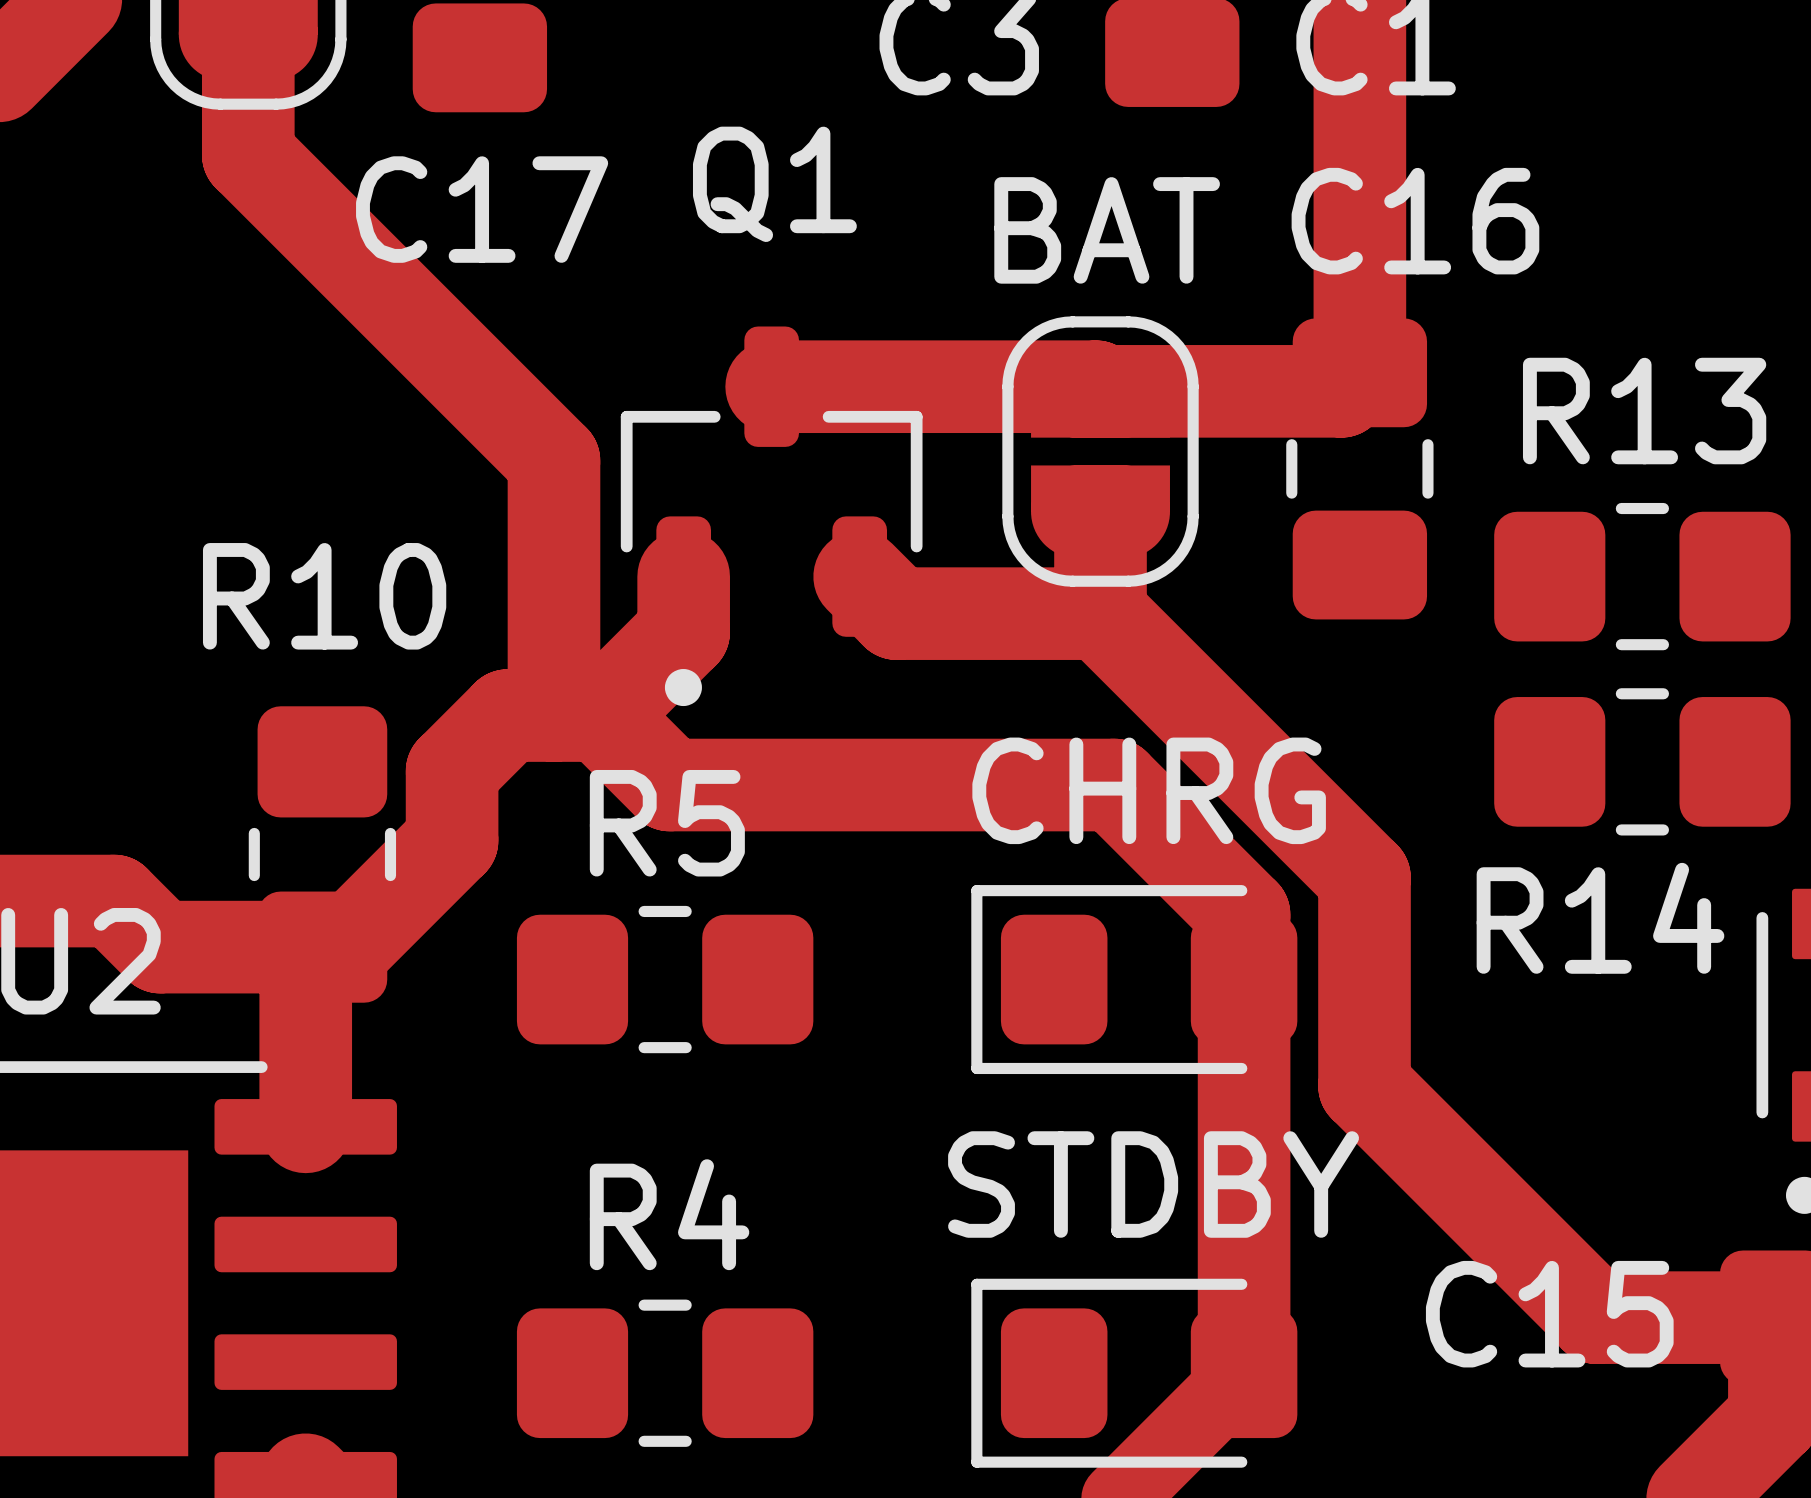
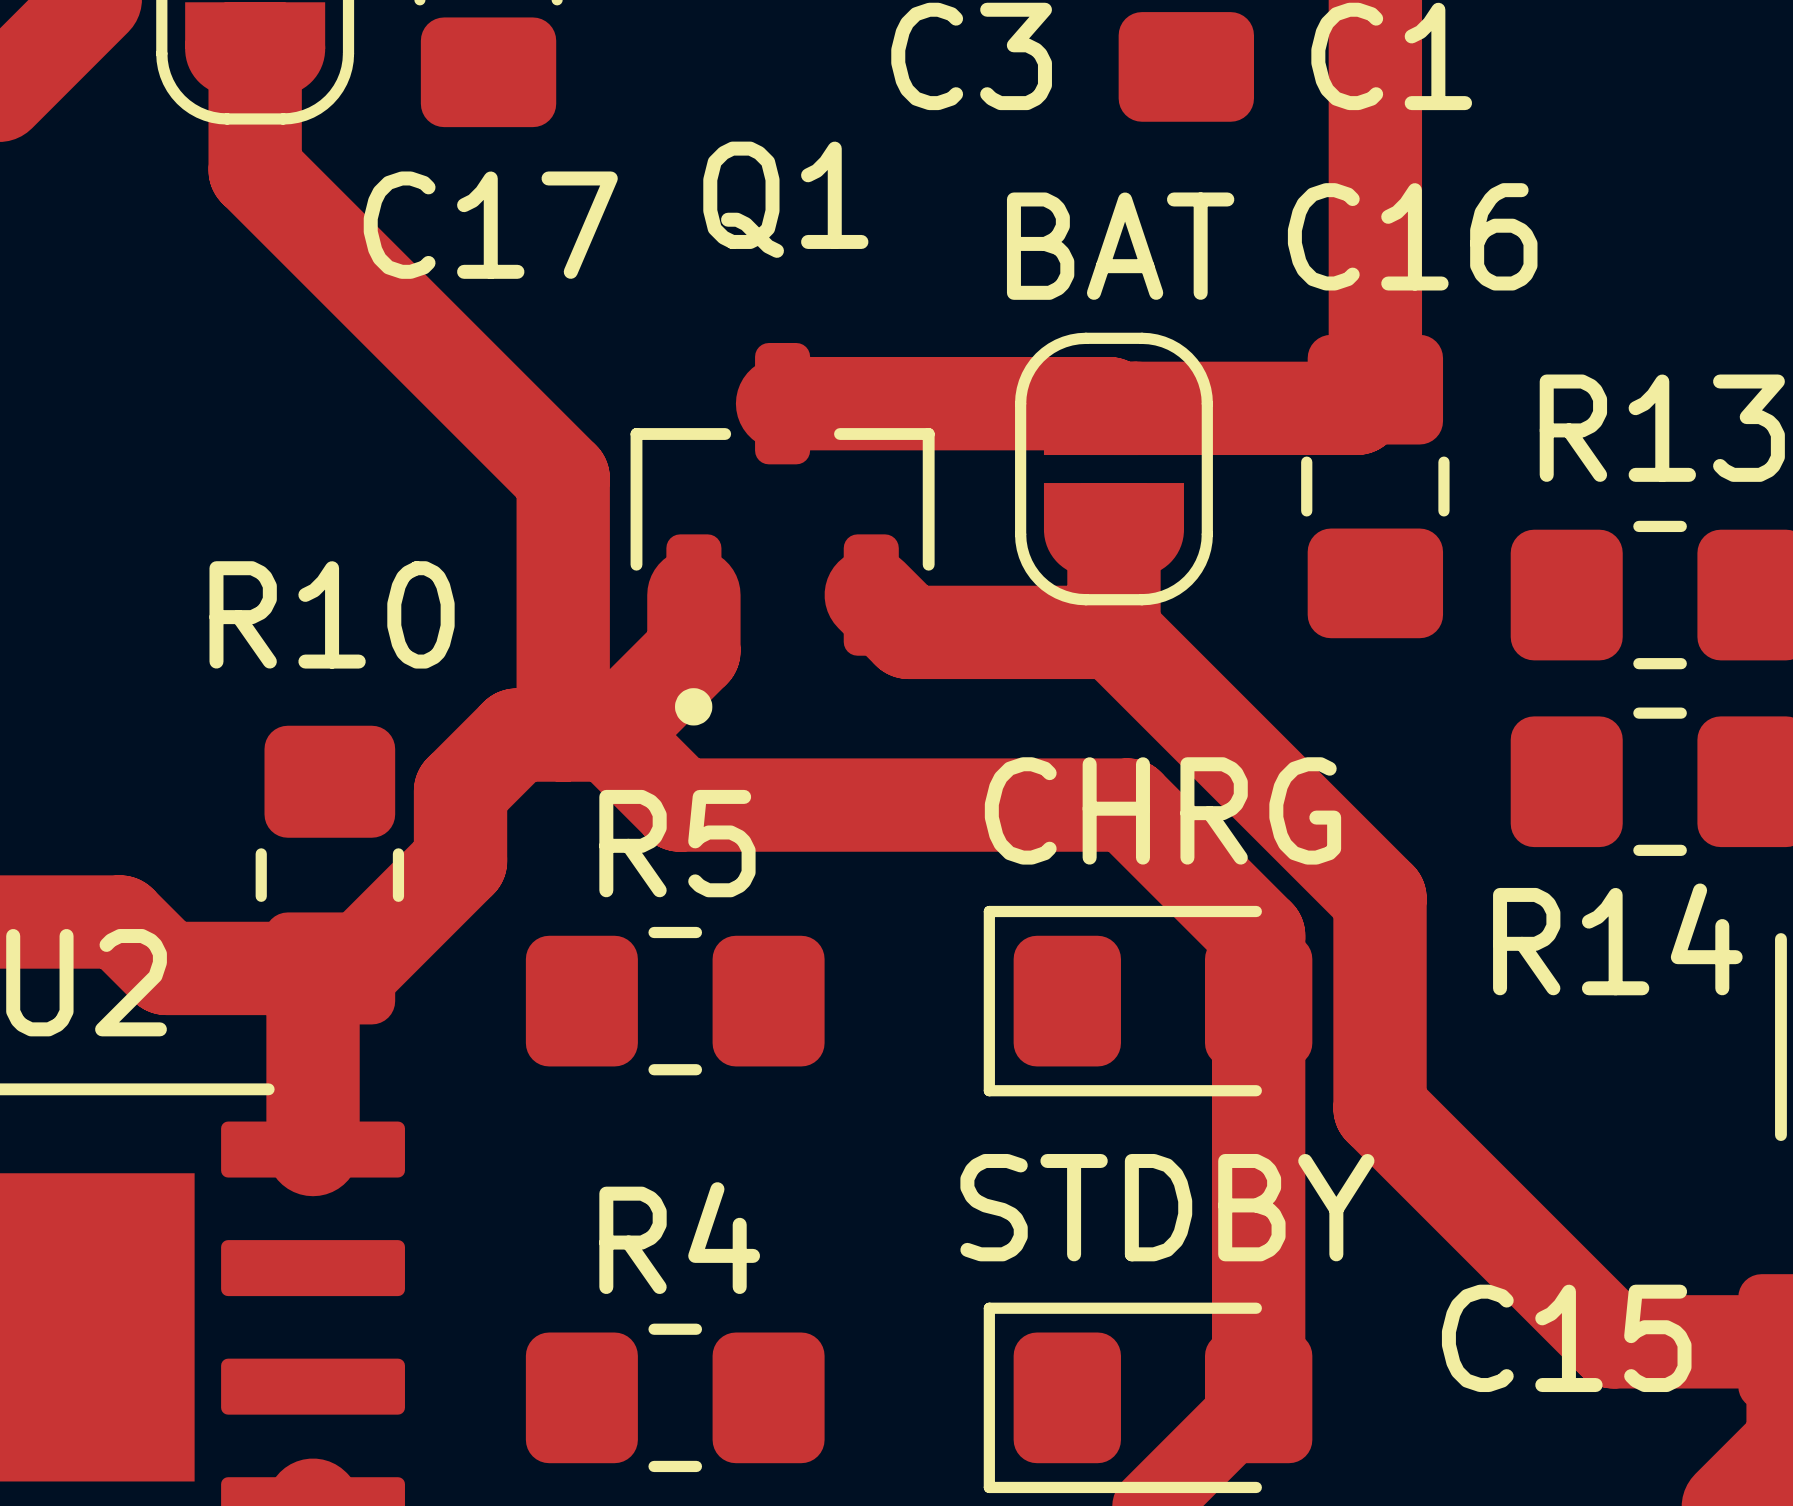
C16 name position: C16 (1415, 221) -> C16 (1412, 236)

